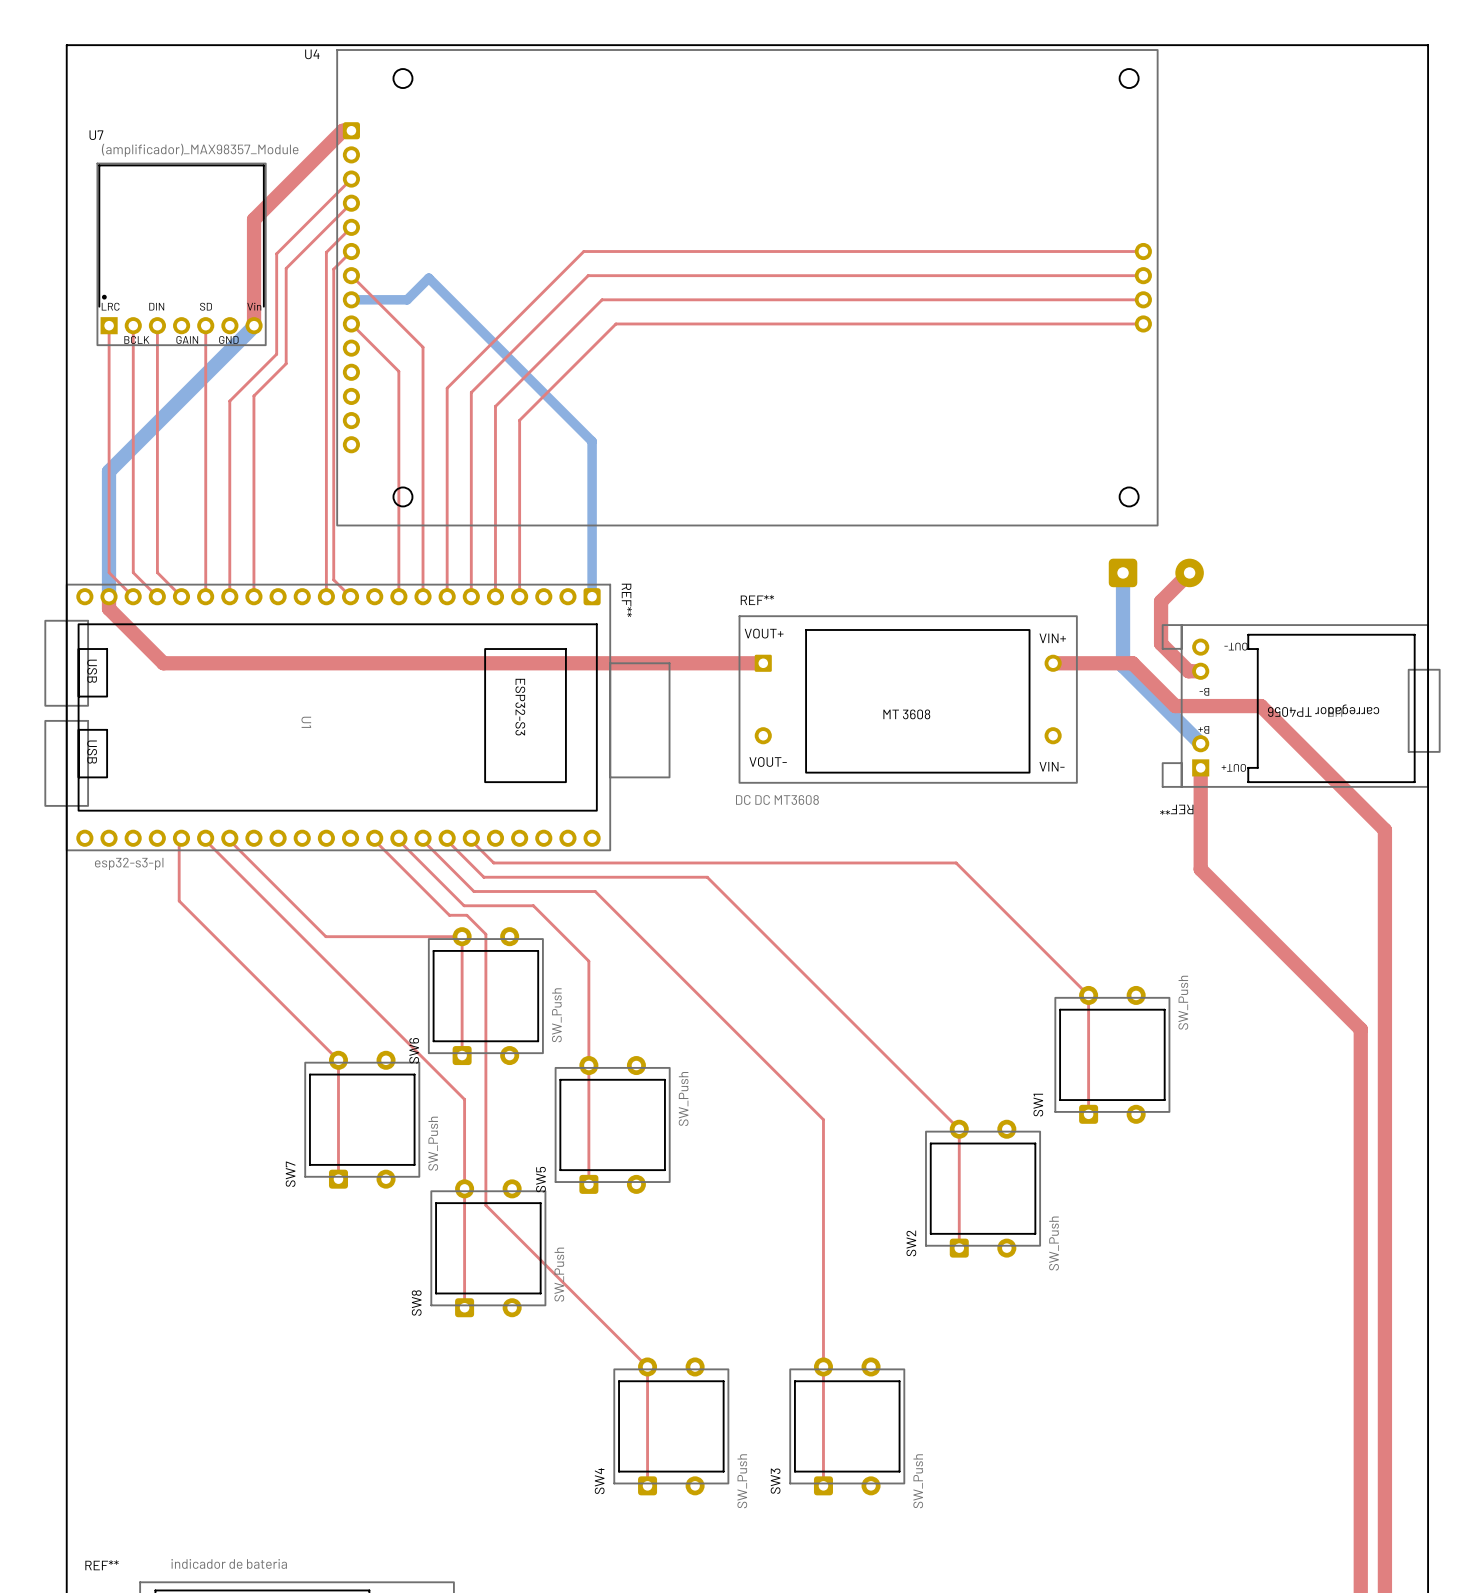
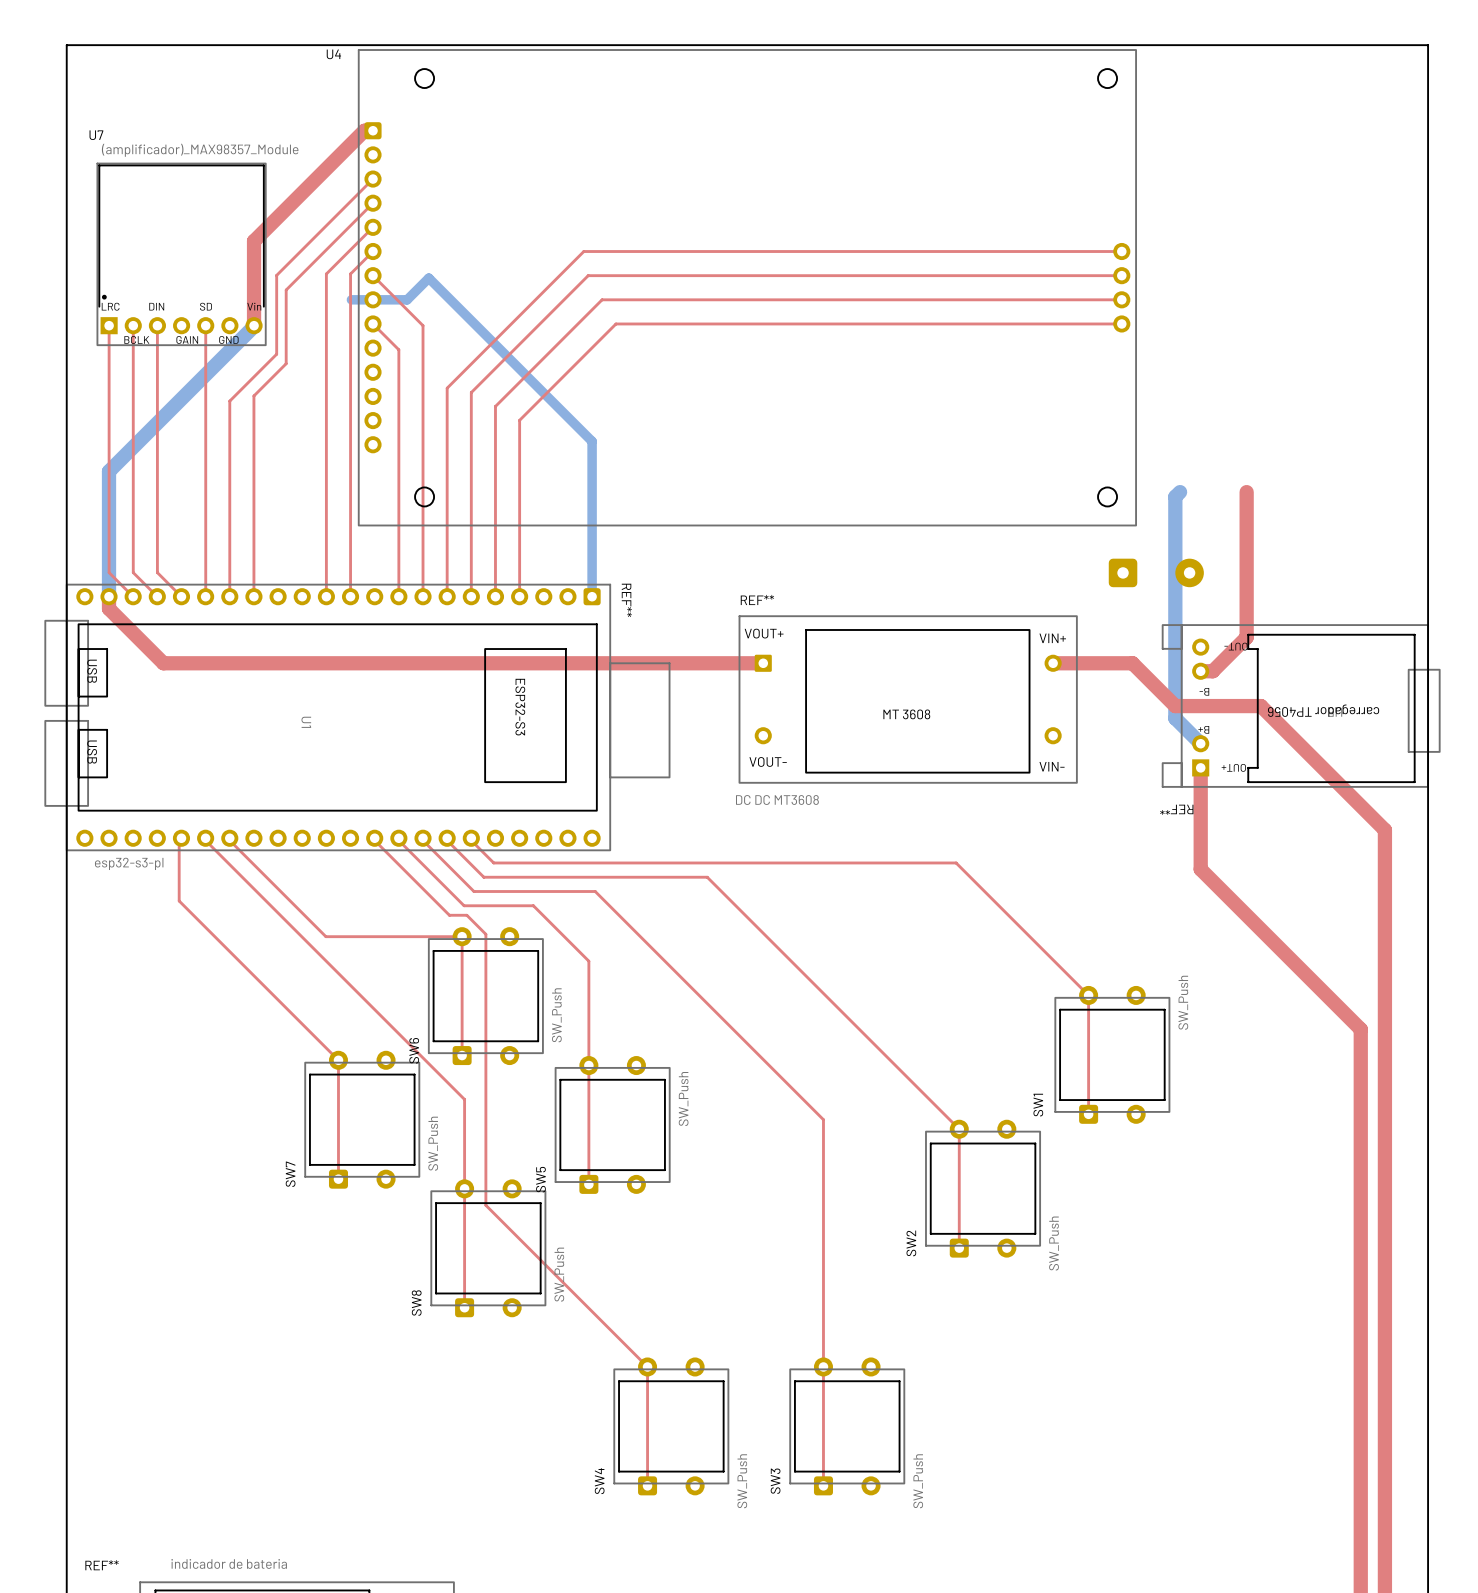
U4 footprint: [336, 49, 1159, 526] -> [358, 49, 1137, 526]
U4 name position: U4 (312, 54) -> U4 (333, 54)
top track: (351, 130) (342, 130) (254, 219) (254, 241) -> (373, 130) (364, 130) (254, 241)
top track: (351, 179) (276, 253) (276, 275) -> (373, 179) (276, 275)
top track: (351, 203) (286, 268) (286, 290) -> (373, 203) (286, 290)
top track: (351, 227) (326, 252) (326, 273) -> (373, 227) (326, 273)
top track: (351, 251) (333, 269) (333, 579) (350, 596) -> (373, 251) (350, 273) (350, 596)
top track: (1121, 251) (1143, 251) -> none
top track: (351, 275) (423, 347) -> (373, 275) (423, 325) (423, 347)
top track: (1121, 275) (1143, 275) -> none
top track: (1121, 299) (1143, 299) -> none
top track: (351, 323) (398, 371) -> (373, 323) (398, 349) (398, 371)
top track: (1121, 323) (1143, 323) -> none
bottom track: (1123, 572) (1123, 666) (1175, 718) -> (1180, 492) (1175, 496) (1175, 718)
top track: (1189, 572) (1161, 601) (1161, 643) (1188, 671) (1200, 671) -> (1246, 492) (1246, 637) (1212, 671) (1200, 671)

